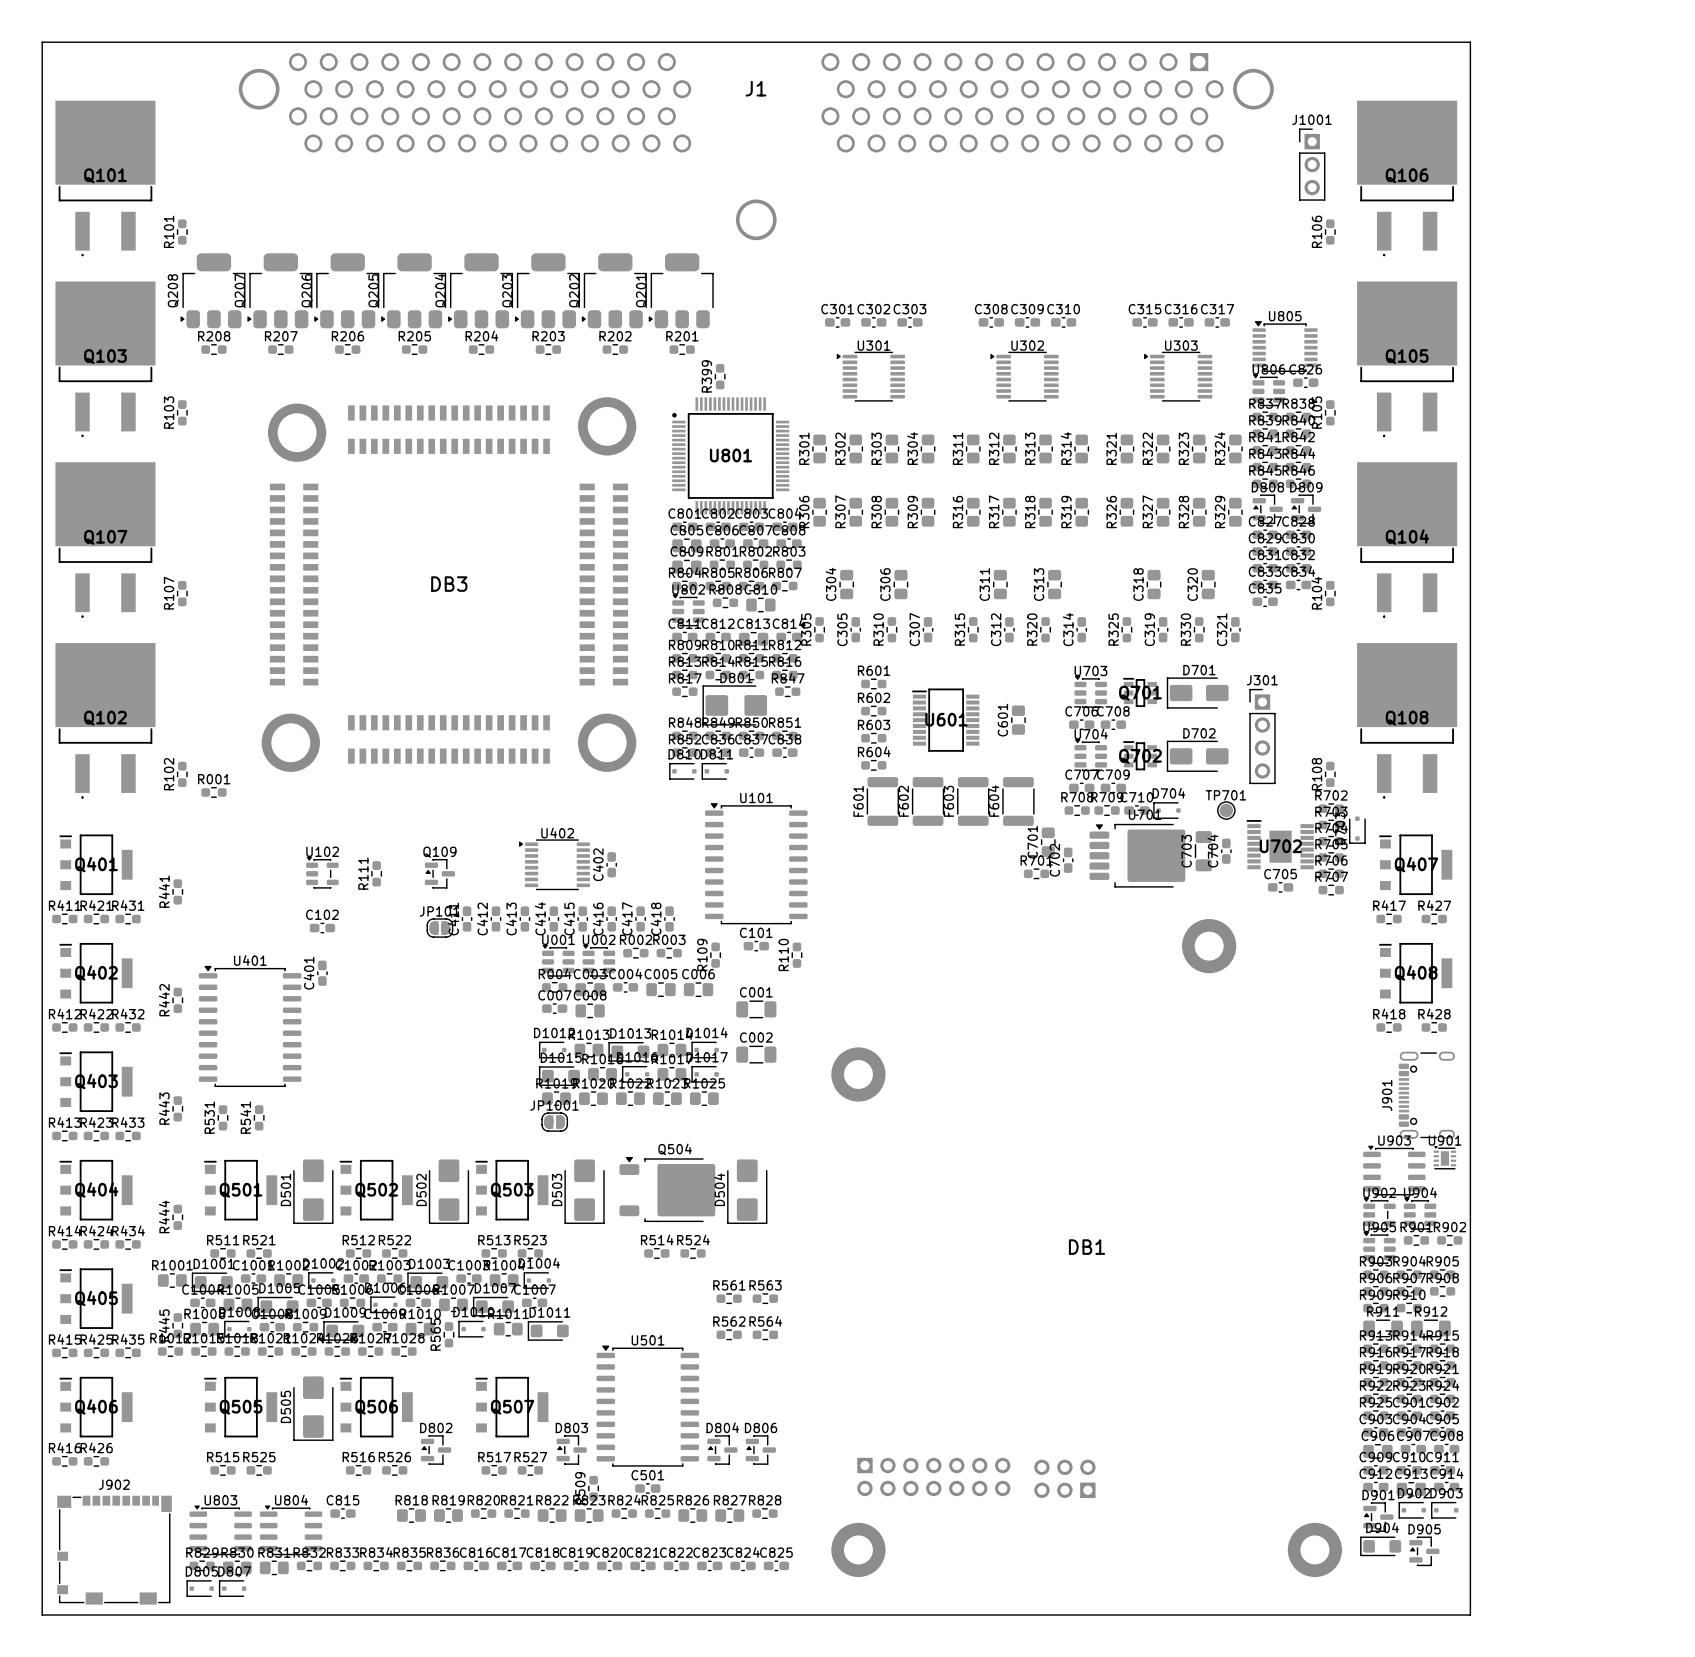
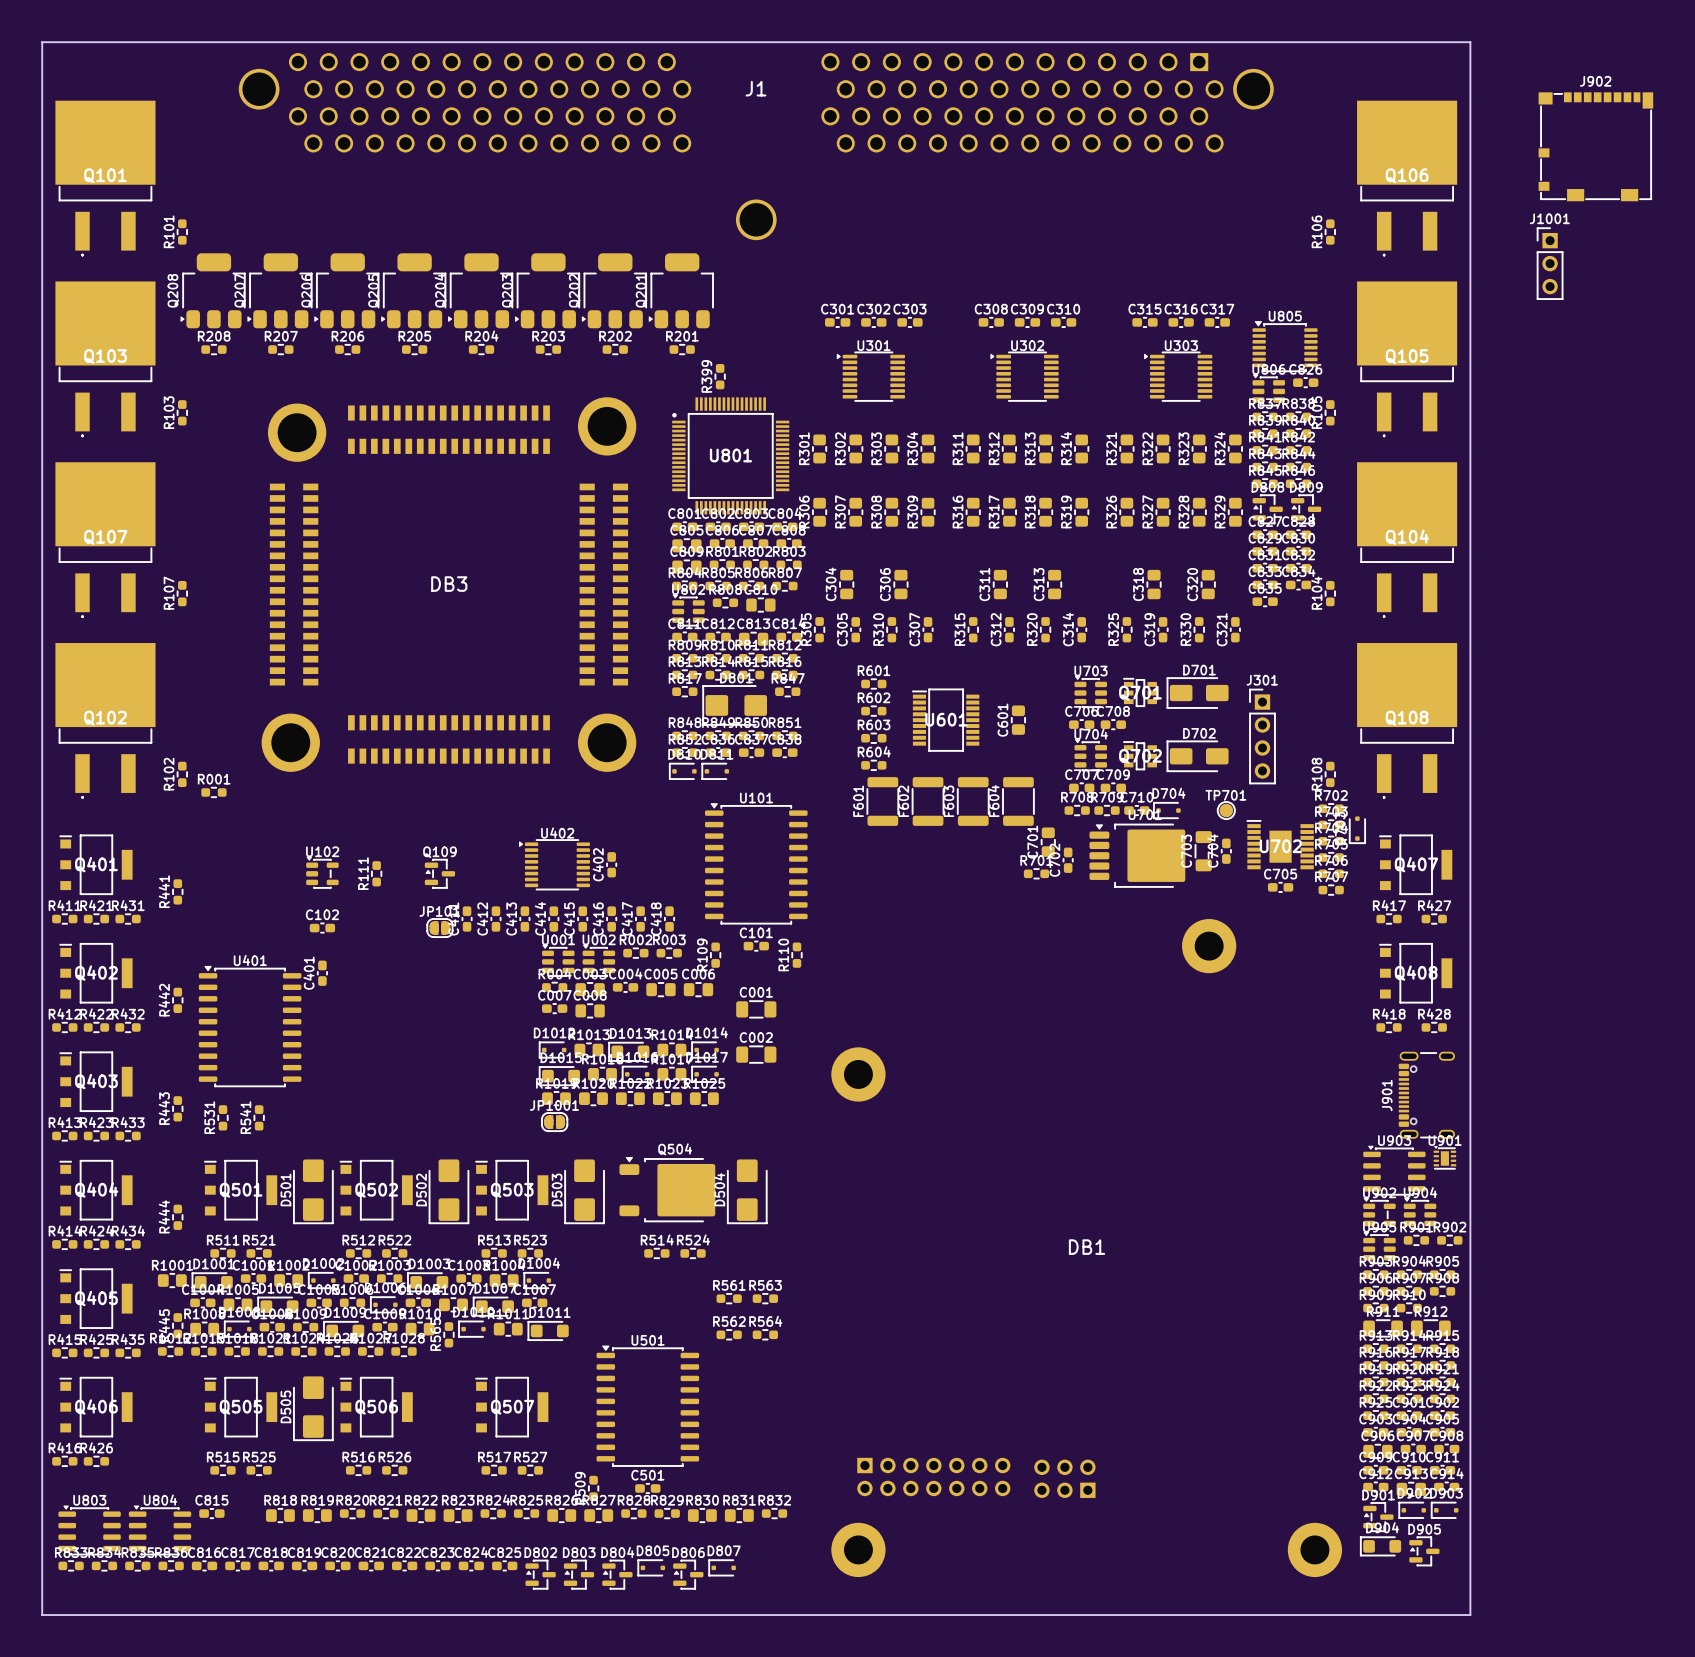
J1001 position: (1312, 164) -> (1550, 263)
D802 position: (436, 1450) -> (540, 1574)
D803 position: (571, 1450) -> (579, 1574)
D804 position: (722, 1450) -> (617, 1574)
D806 position: (760, 1450) -> (688, 1574)
C815 position: (342, 1513) -> (211, 1513)
R820 position: (483, 1513) -> (352, 1513)
R821 position: (516, 1513) -> (385, 1513)
R824 position: (624, 1513) -> (493, 1513)
R825 position: (657, 1513) -> (526, 1513)
R828 position: (764, 1513) -> (633, 1513)
R818 position: (411, 1515) -> (280, 1515)
R819 position: (448, 1515) -> (317, 1515)
R822 position: (552, 1515) -> (421, 1515)
R823 position: (589, 1515) -> (458, 1515)
R826 position: (692, 1515) -> (561, 1515)
R827 position: (729, 1515) -> (598, 1515)
U803 position: (220, 1530) -> (89, 1530)
U804 position: (291, 1530) -> (160, 1530)
J902 position: (114, 1550) -> (1595, 146)
R829 position: (202, 1565) -> (667, 1513)
R832 position: (309, 1565) -> (774, 1513)
R833 position: (342, 1565) -> (71, 1565)
R834 position: (376, 1565) -> (104, 1565)
R835 position: (409, 1565) -> (137, 1565)
R836 position: (442, 1565) -> (171, 1565)
C816 position: (476, 1565) -> (204, 1565)
C817 position: (509, 1565) -> (237, 1565)
C818 position: (542, 1565) -> (271, 1565)
C819 position: (576, 1565) -> (304, 1565)
C820 position: (609, 1565) -> (337, 1565)
C821 position: (642, 1565) -> (371, 1565)
C822 position: (676, 1565) -> (404, 1565)
C823 position: (709, 1565) -> (437, 1565)
C824 position: (743, 1565) -> (471, 1565)
C825 position: (776, 1565) -> (504, 1565)
R830 position: (237, 1567) -> (702, 1515)
R831 position: (274, 1567) -> (739, 1515)
D805 position: (200, 1588) -> (651, 1567)
D807 position: (232, 1588) -> (722, 1567)

